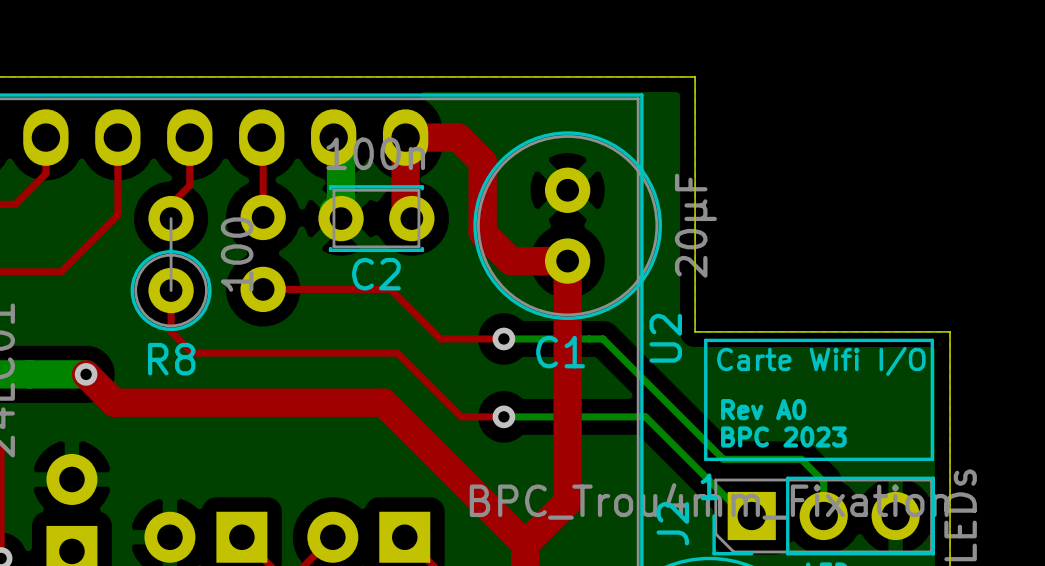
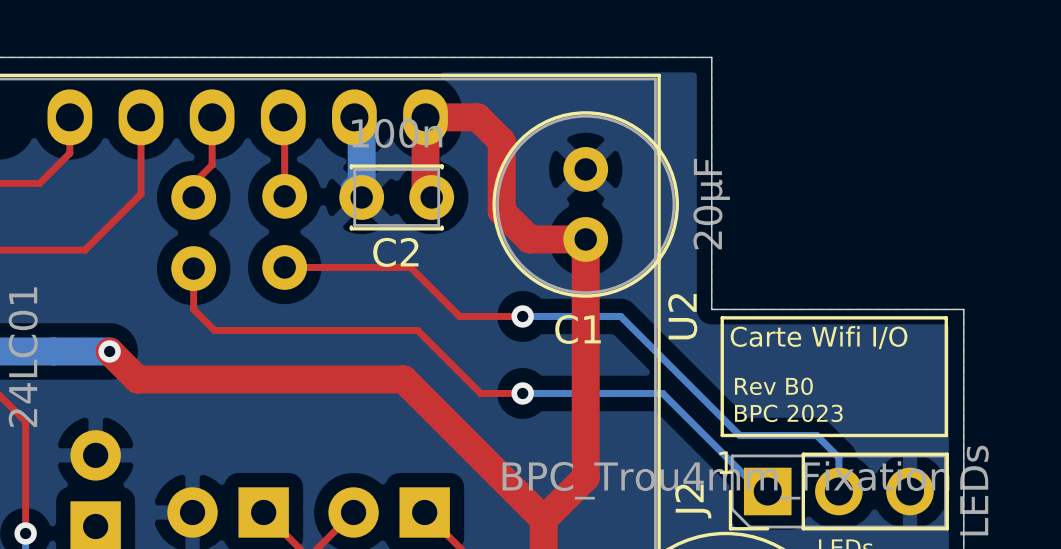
R8 side: top (171, 263) -> bottom (193, 233)
text: Rev A0 (763, 409) -> Rev B0 (773, 386)

